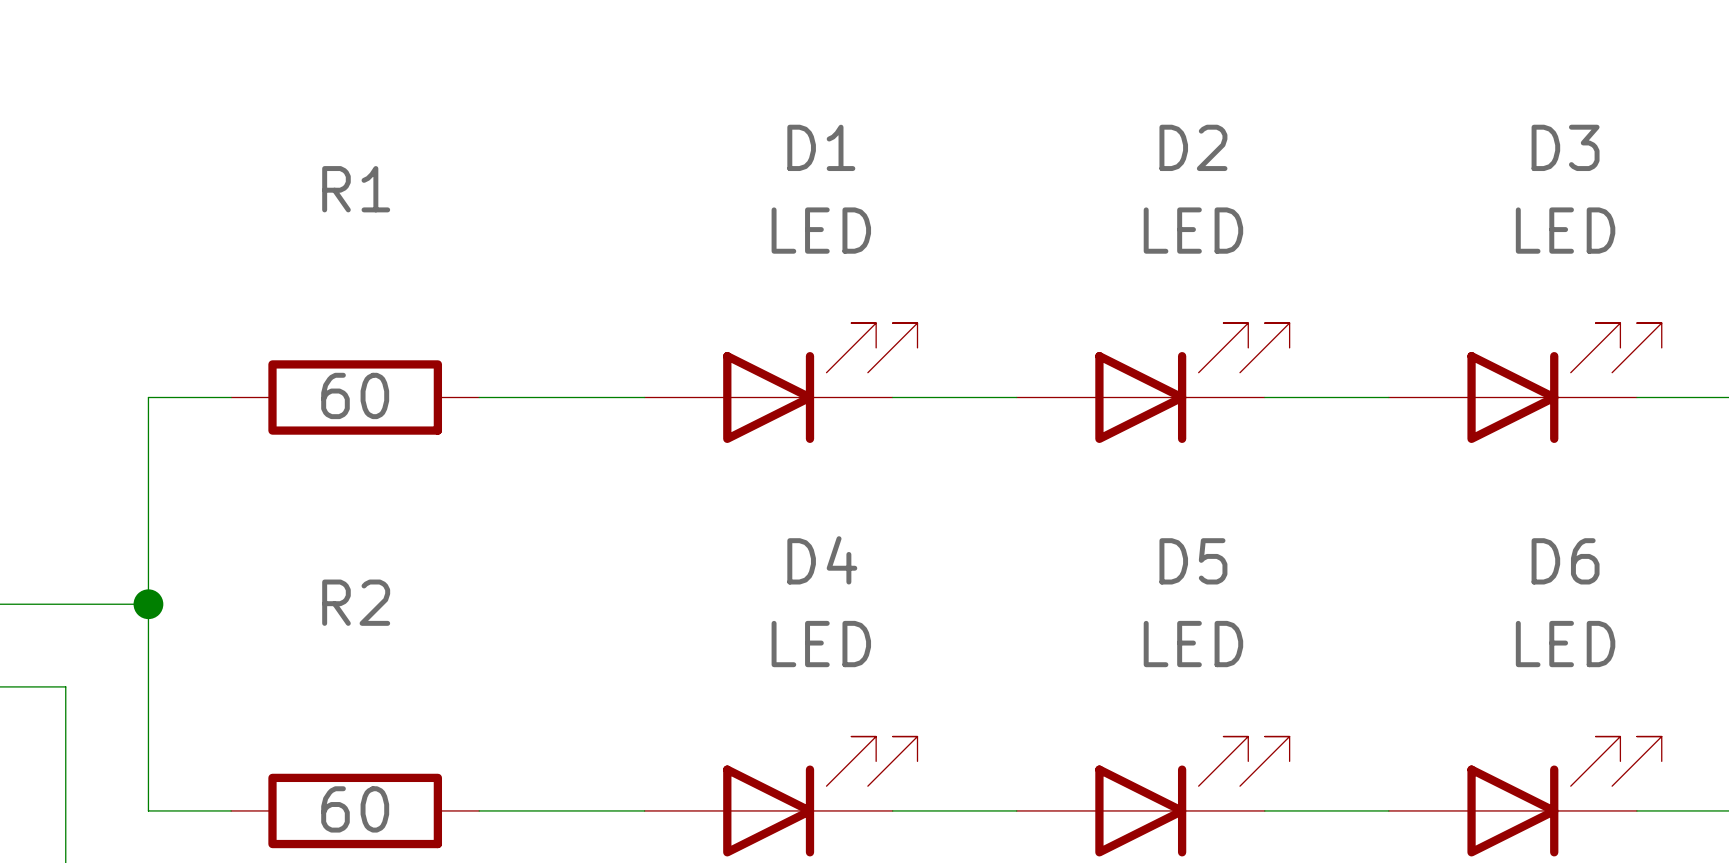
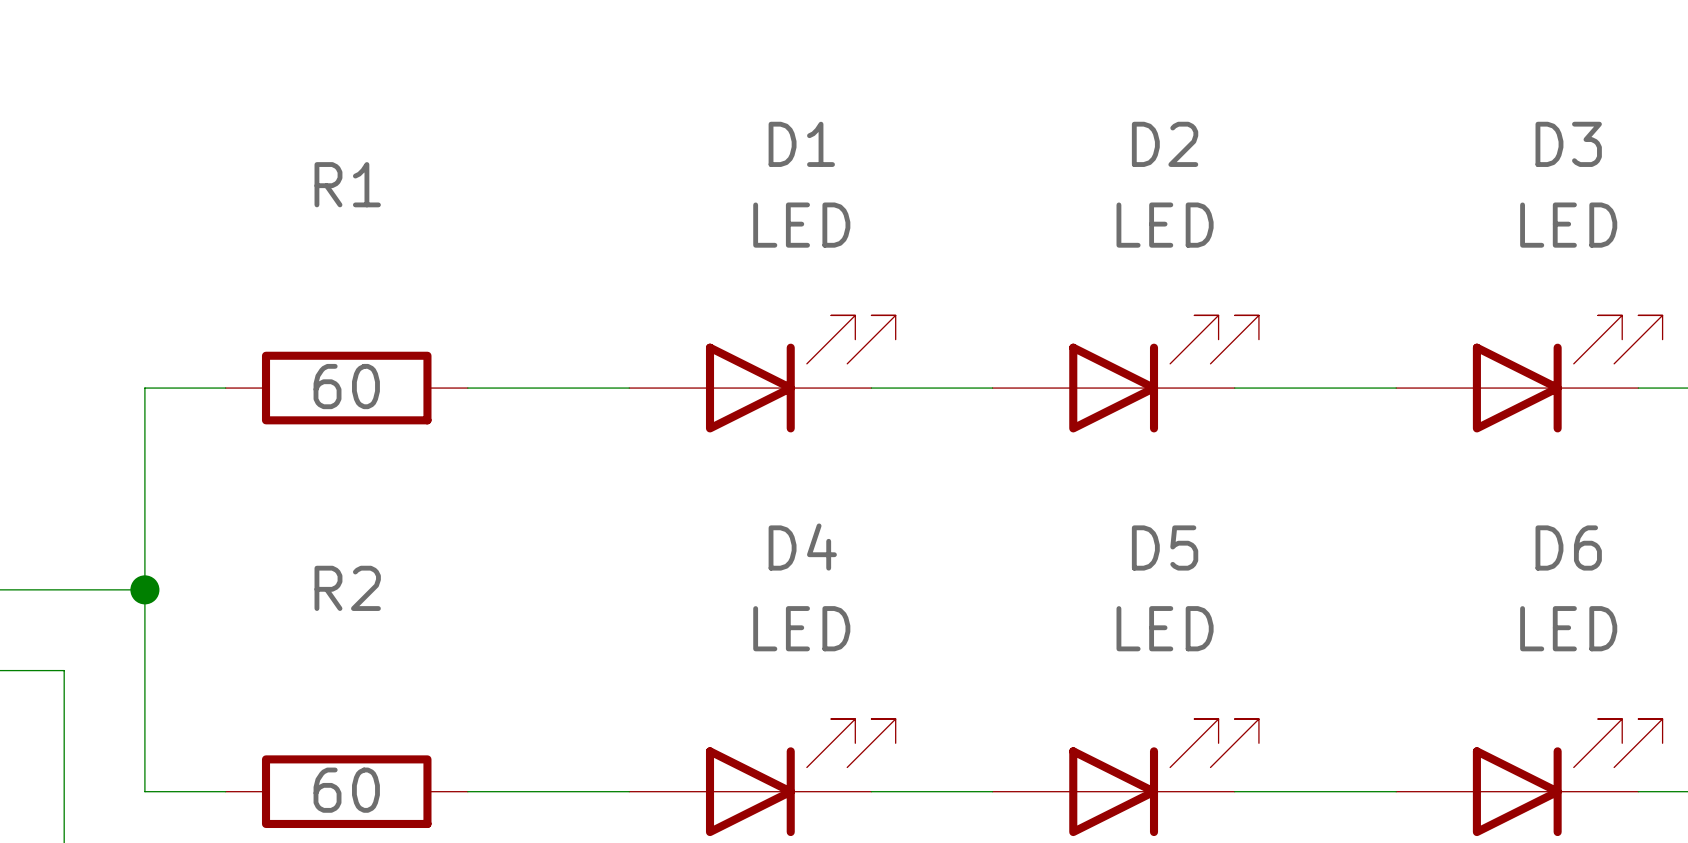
D3 position: (1525, 383) -> (1529, 373)
D6 position: (1525, 796) -> (1529, 777)

